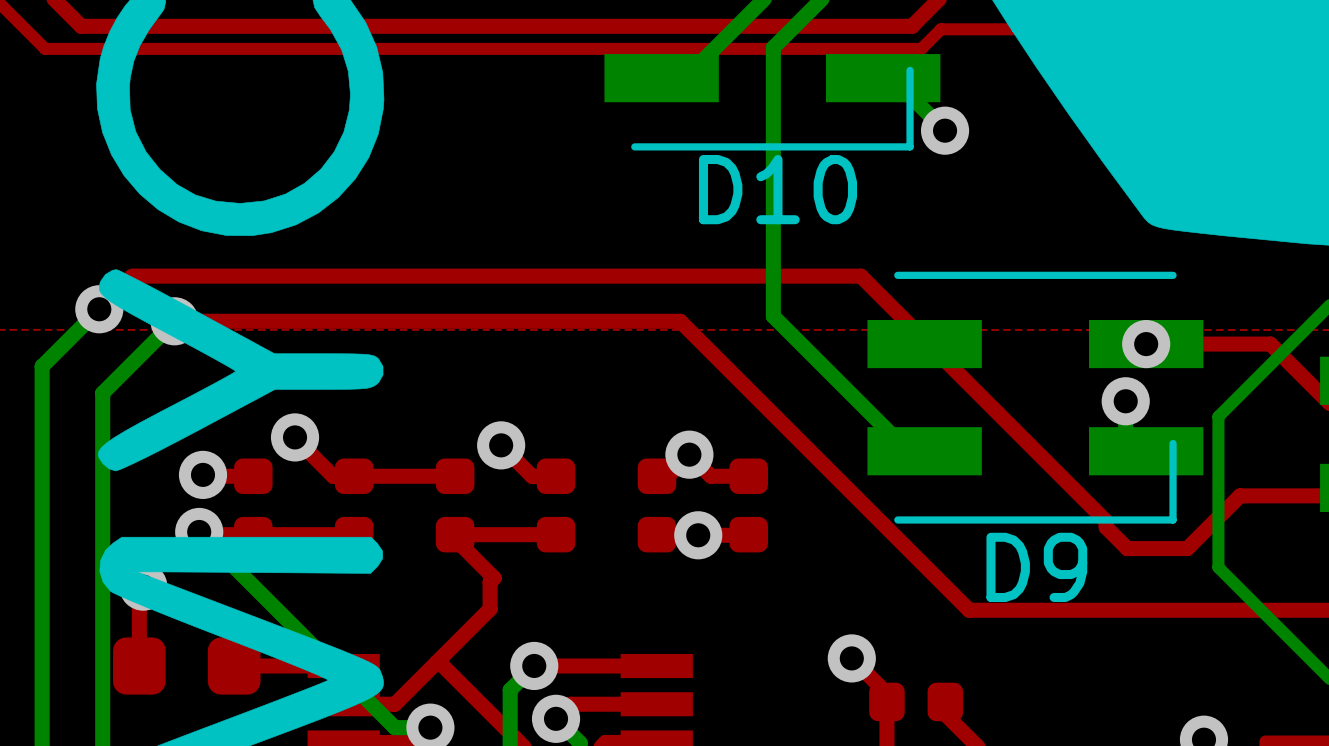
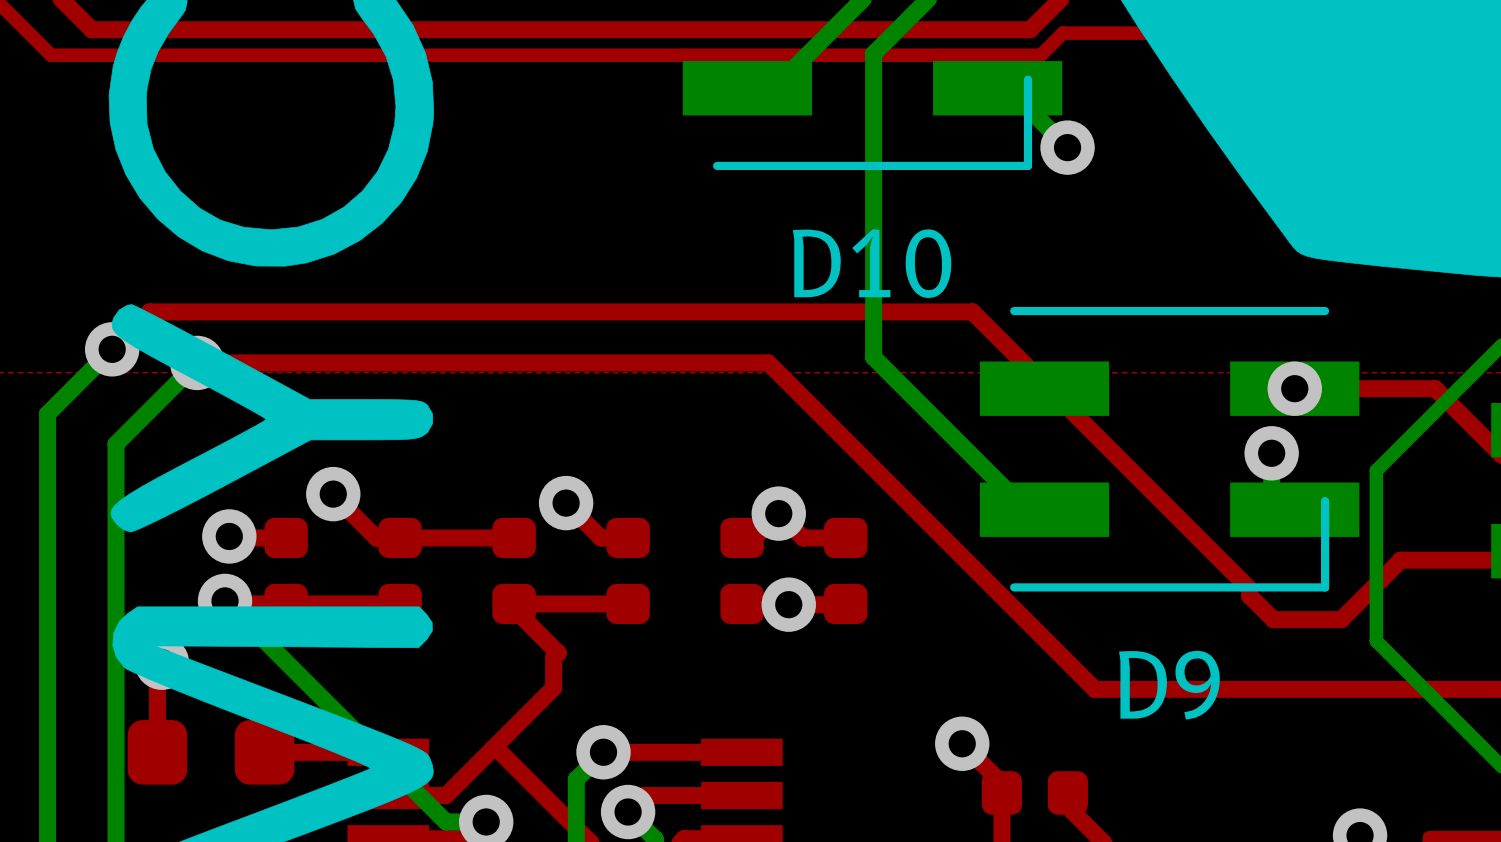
D10 name position: D10 (778, 189) -> D10 (872, 263)
D9 name position: D9 (1036, 567) -> D9 (1169, 685)

